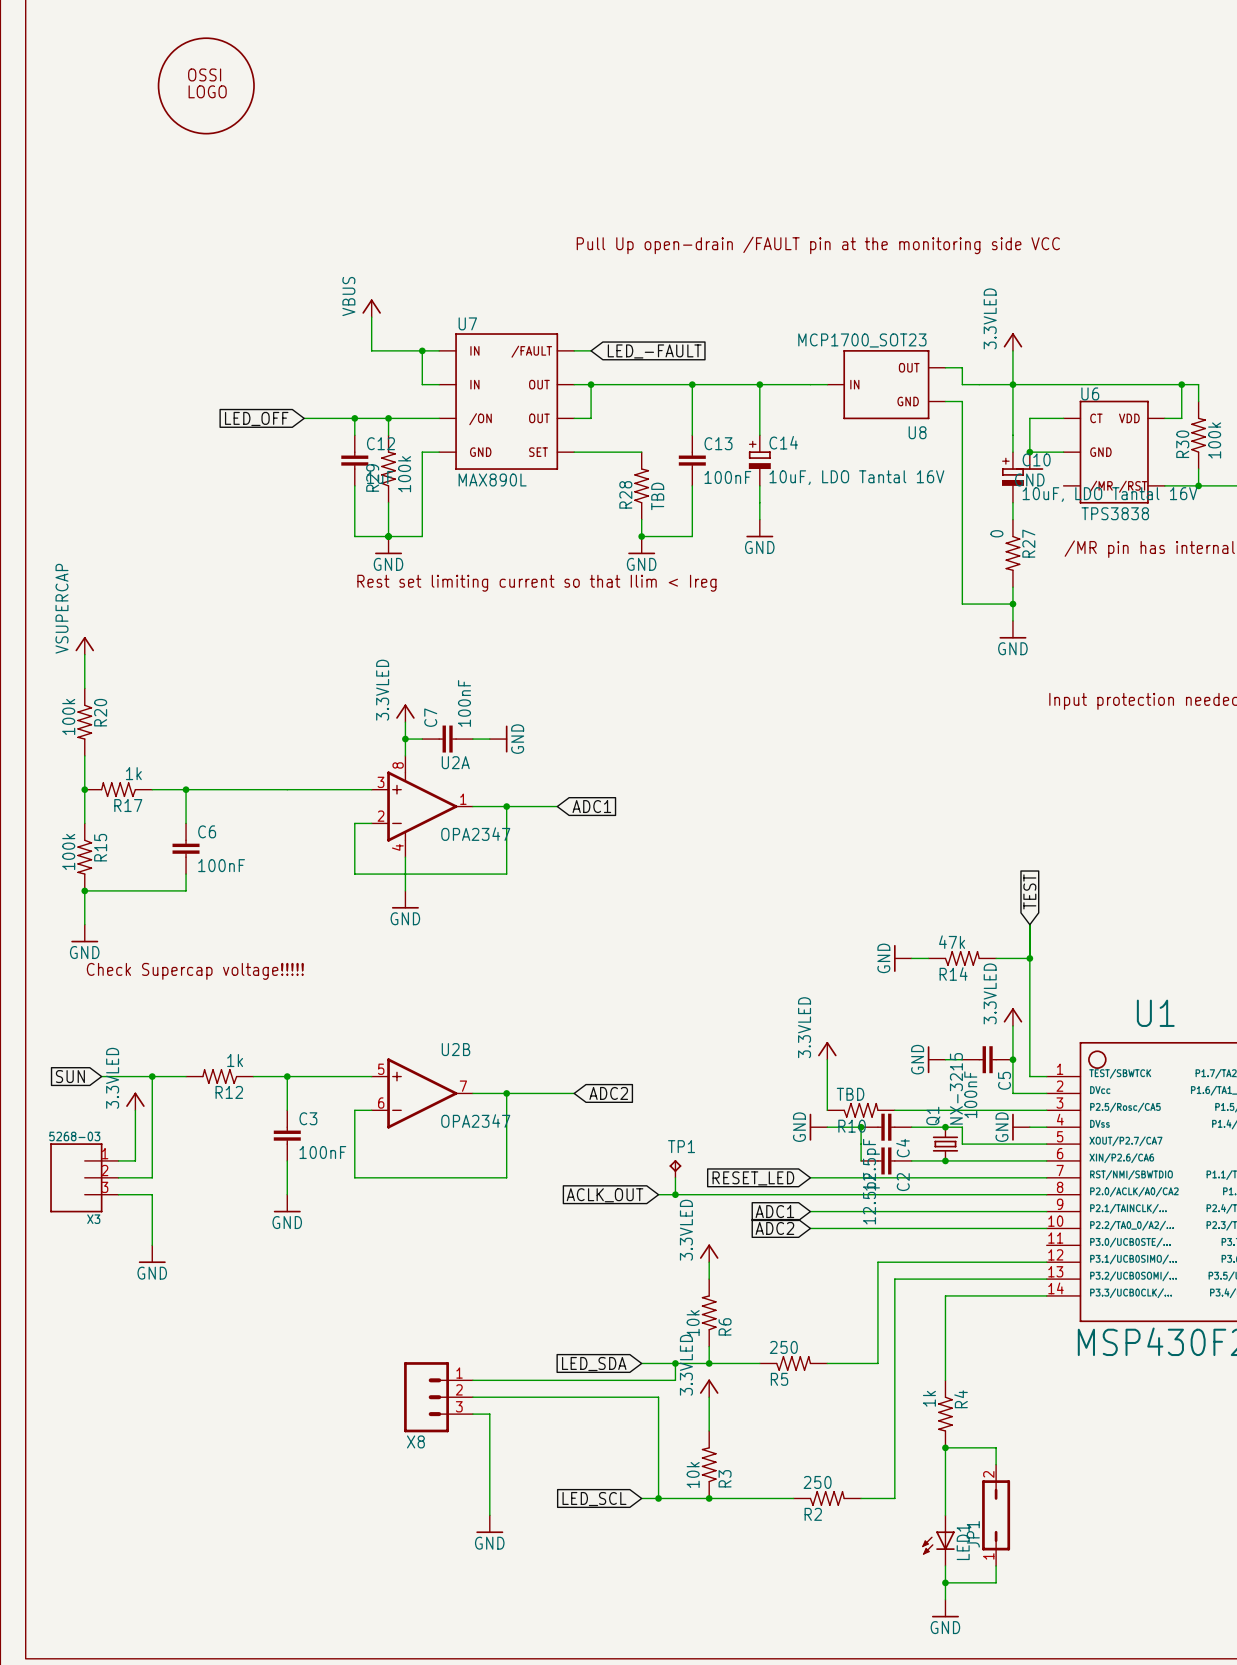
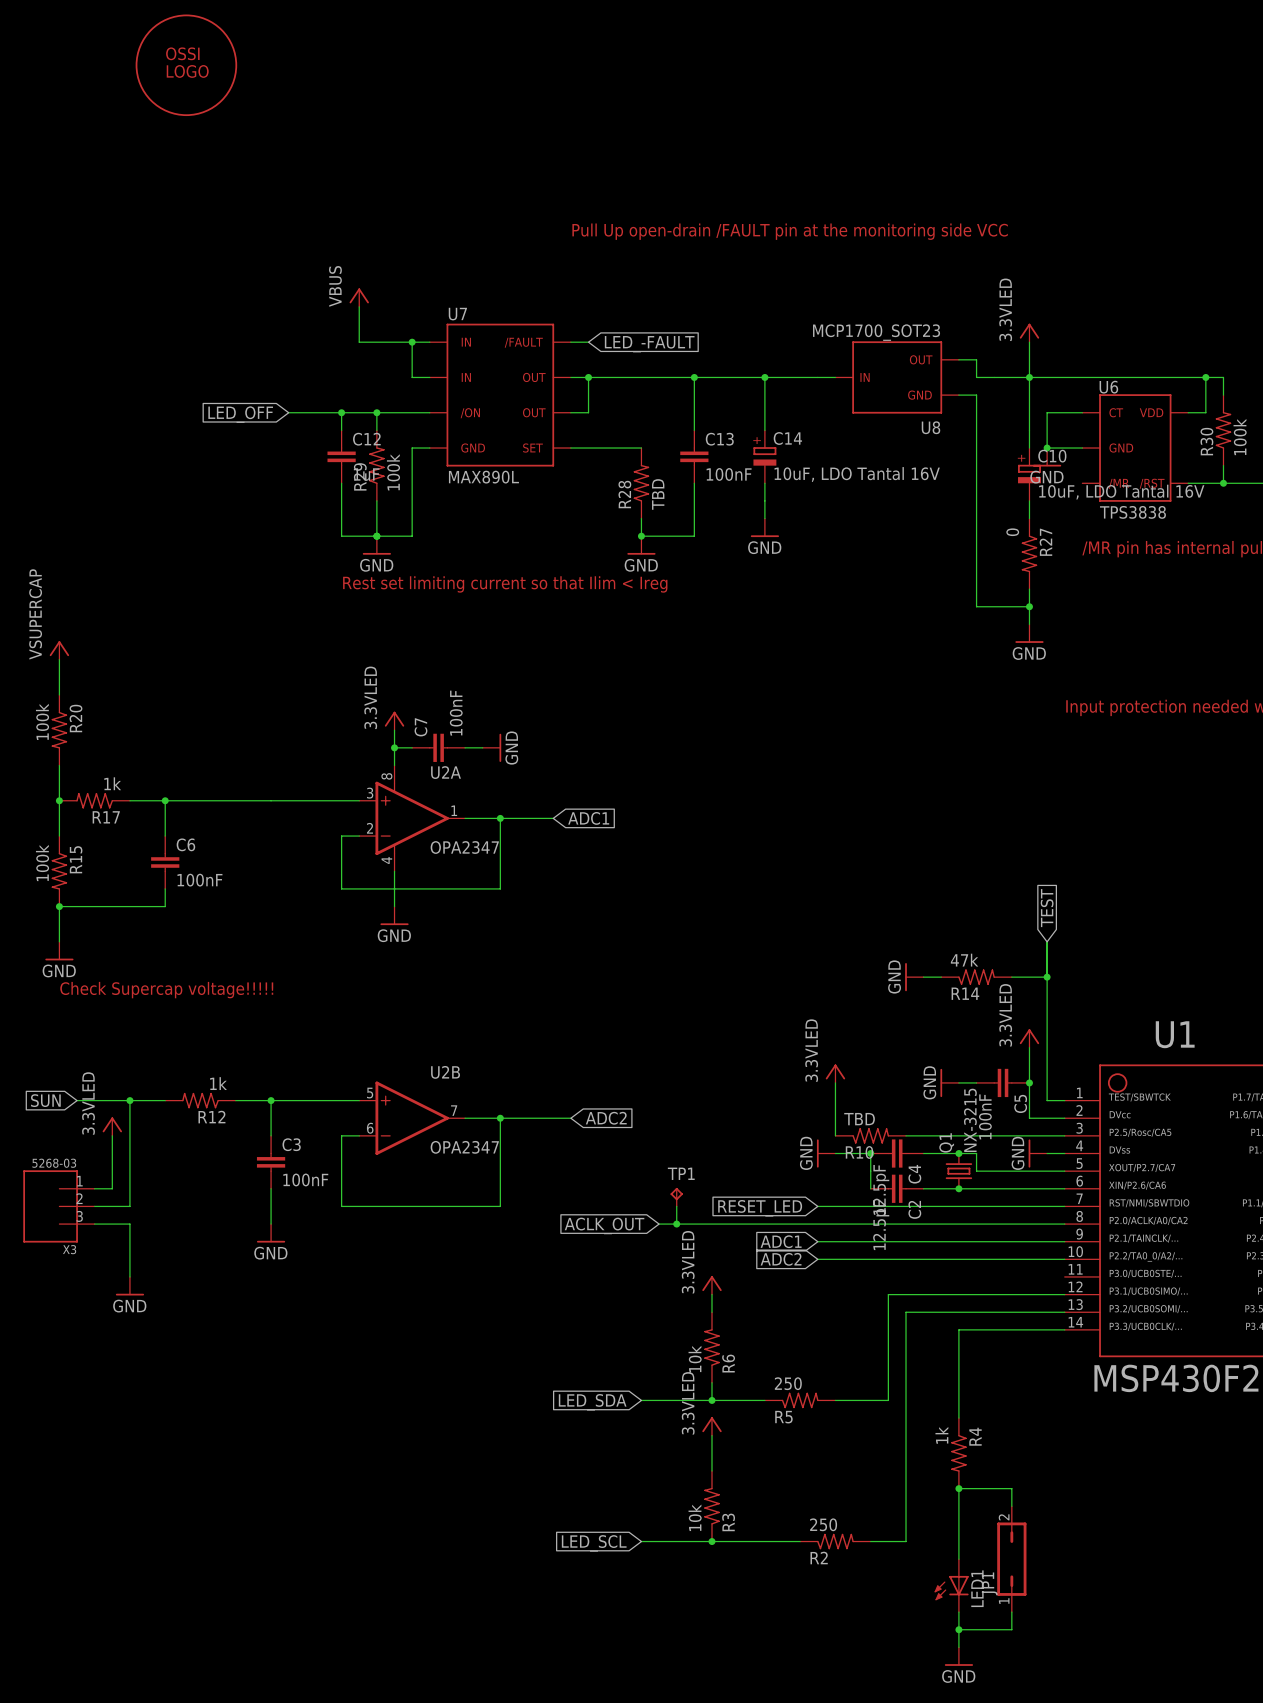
wire: (675, 1363) (675, 1380) (472, 1380) -> none
junction: (675, 1363) -> none
X8: (438, 1397) -> none
wire: (472, 1397) (658, 1397) (658, 1498) -> none
wire: (472, 1414) (489, 1414) (489, 1515) -> none
junction: (658, 1498) -> none
power symbol: GND (489, 1524) -> none

